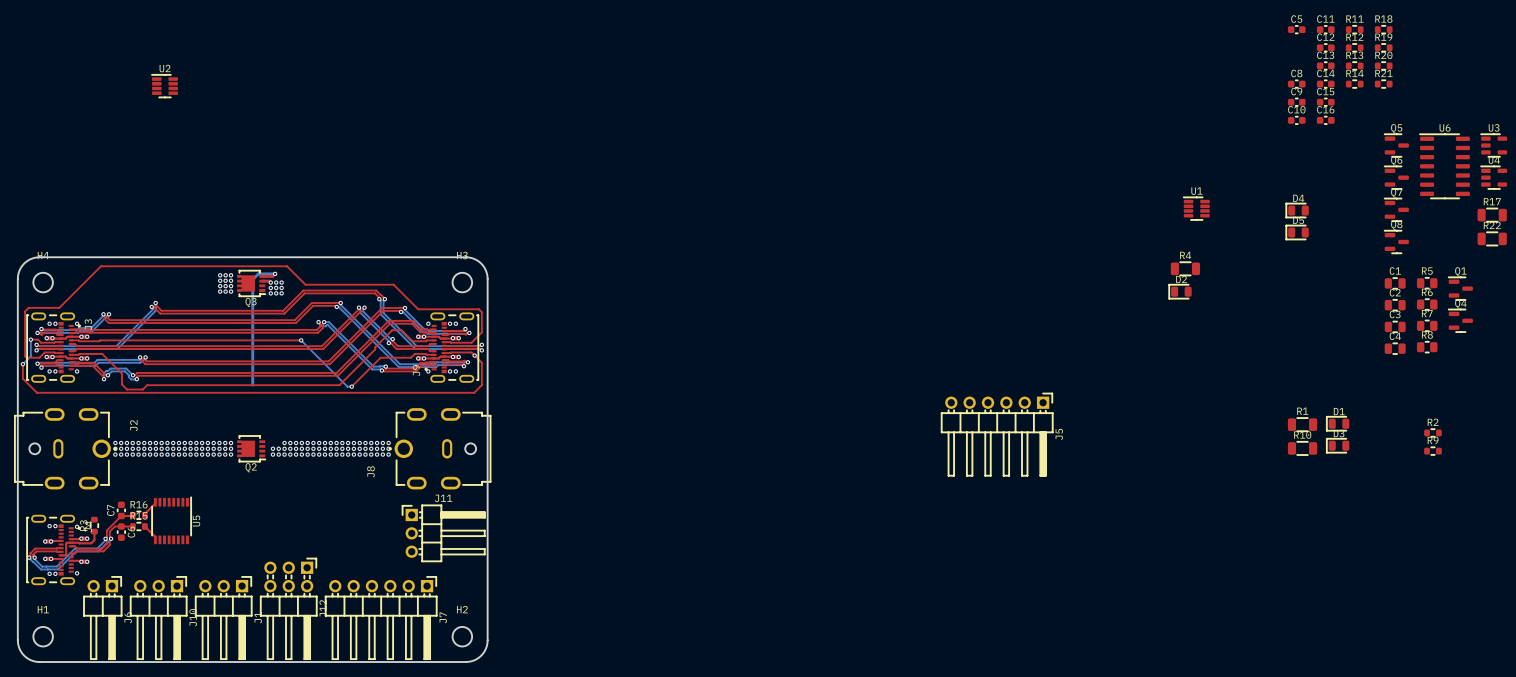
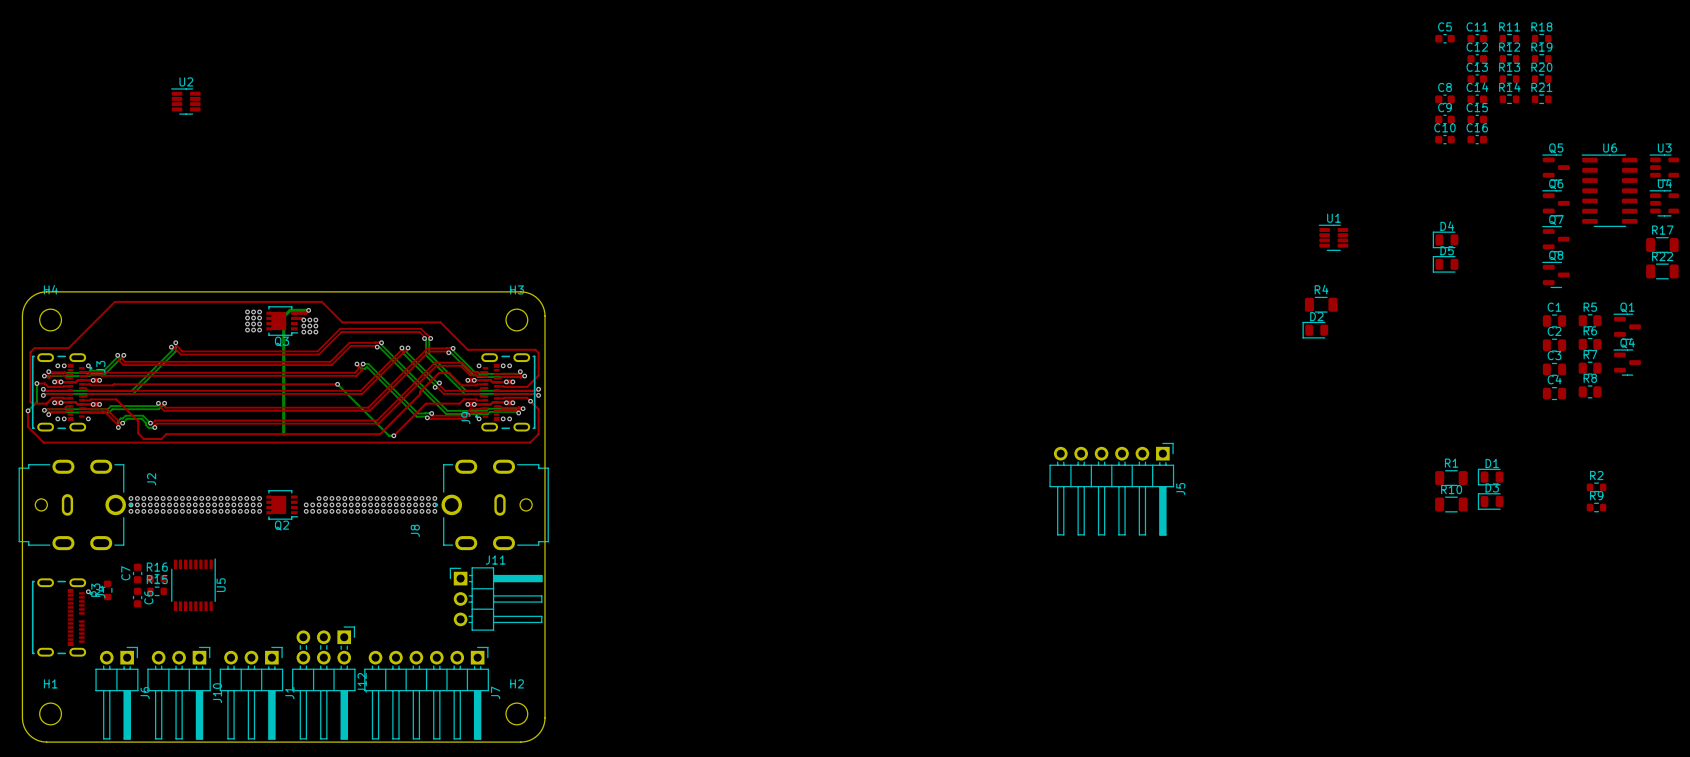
top track: (155, 502) (144, 513) -> none
top track: (132, 515) (121, 516) (106, 530) (106, 543) (102, 548) (77, 548) (71, 546) -> none
via: (49, 526) -> none
via: (55, 526) -> none
top track: (132, 526) (114, 526) (109, 531) (109, 544) (103, 551) (77, 551) (71, 553) -> none
top track: (144, 526) (155, 536) (155, 539) -> none
top track: (94, 531) (94, 540) (91, 543) (71, 542) -> none
via: (81, 538) -> none
top track: (87, 538) (71, 539) -> none
via: (87, 538) -> none
bottom track: (105, 538) (97, 548) (75, 548) (57, 566) (46, 566) -> none
via: (105, 538) -> none
bottom track: (111, 538) (98, 551) (76, 551) (58, 569) (47, 569) -> none
via: (111, 538) -> none
top track: (61, 540) (45, 541) -> none
via: (45, 541) -> none
via: (51, 541) -> none
top track: (71, 542) (66, 543) (66, 555) (61, 555) -> none
top track: (61, 548) (35, 548) (29, 557) -> none
top track: (61, 551) (36, 551) (33, 554) (34, 557) -> none
bottom track: (29, 557) (40, 569) (47, 569) -> none
via: (29, 557) -> none
bottom track: (34, 557) (42, 566) (46, 566) -> none
via: (34, 557) -> none
top track: (45, 558) (61, 559) -> none
via: (45, 558) -> none
via: (51, 558) -> none
top track: (71, 560) (87, 561) -> none
via: (81, 561) -> none
via: (87, 561) -> none
via: (49, 573) -> none
via: (55, 573) -> none
via: (77, 573) -> none

